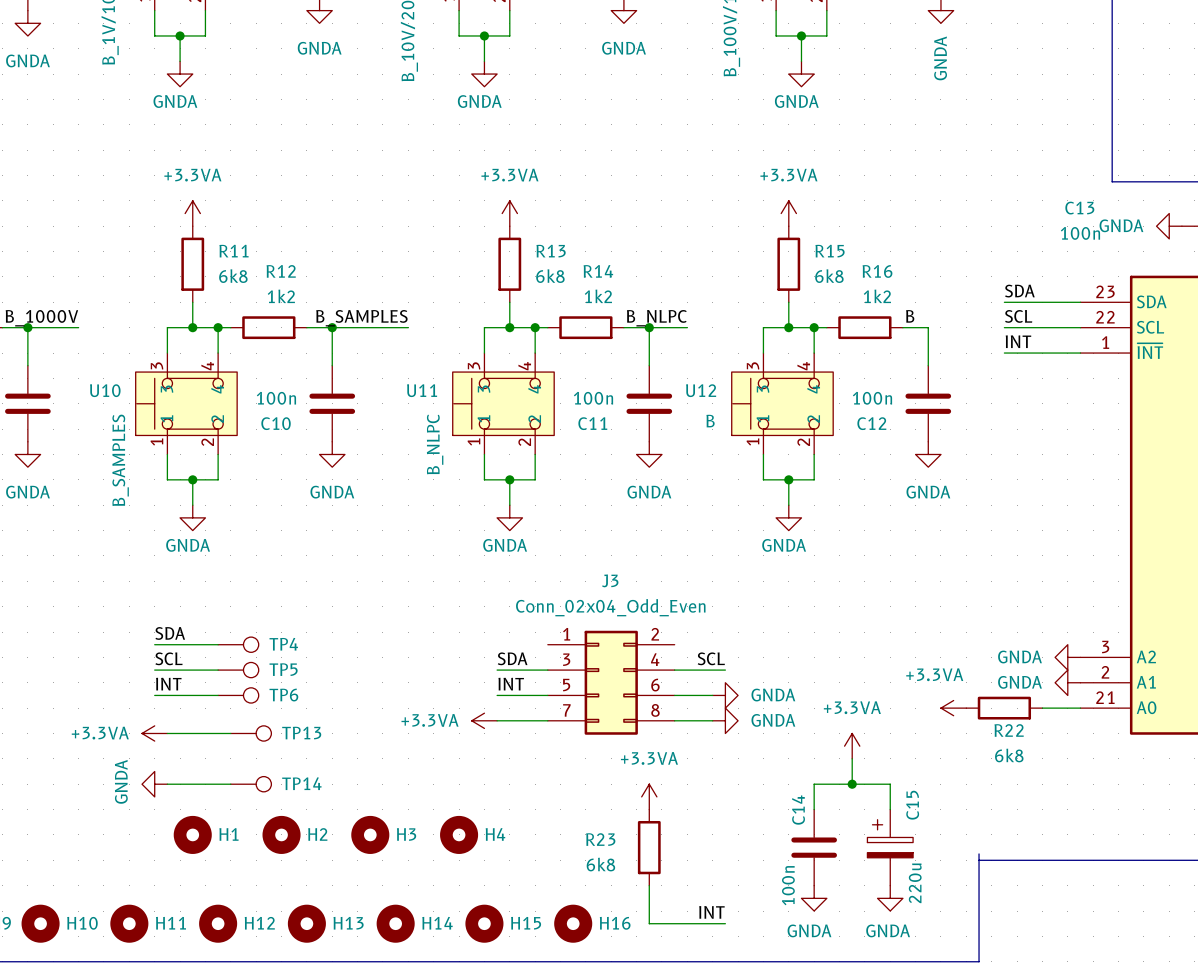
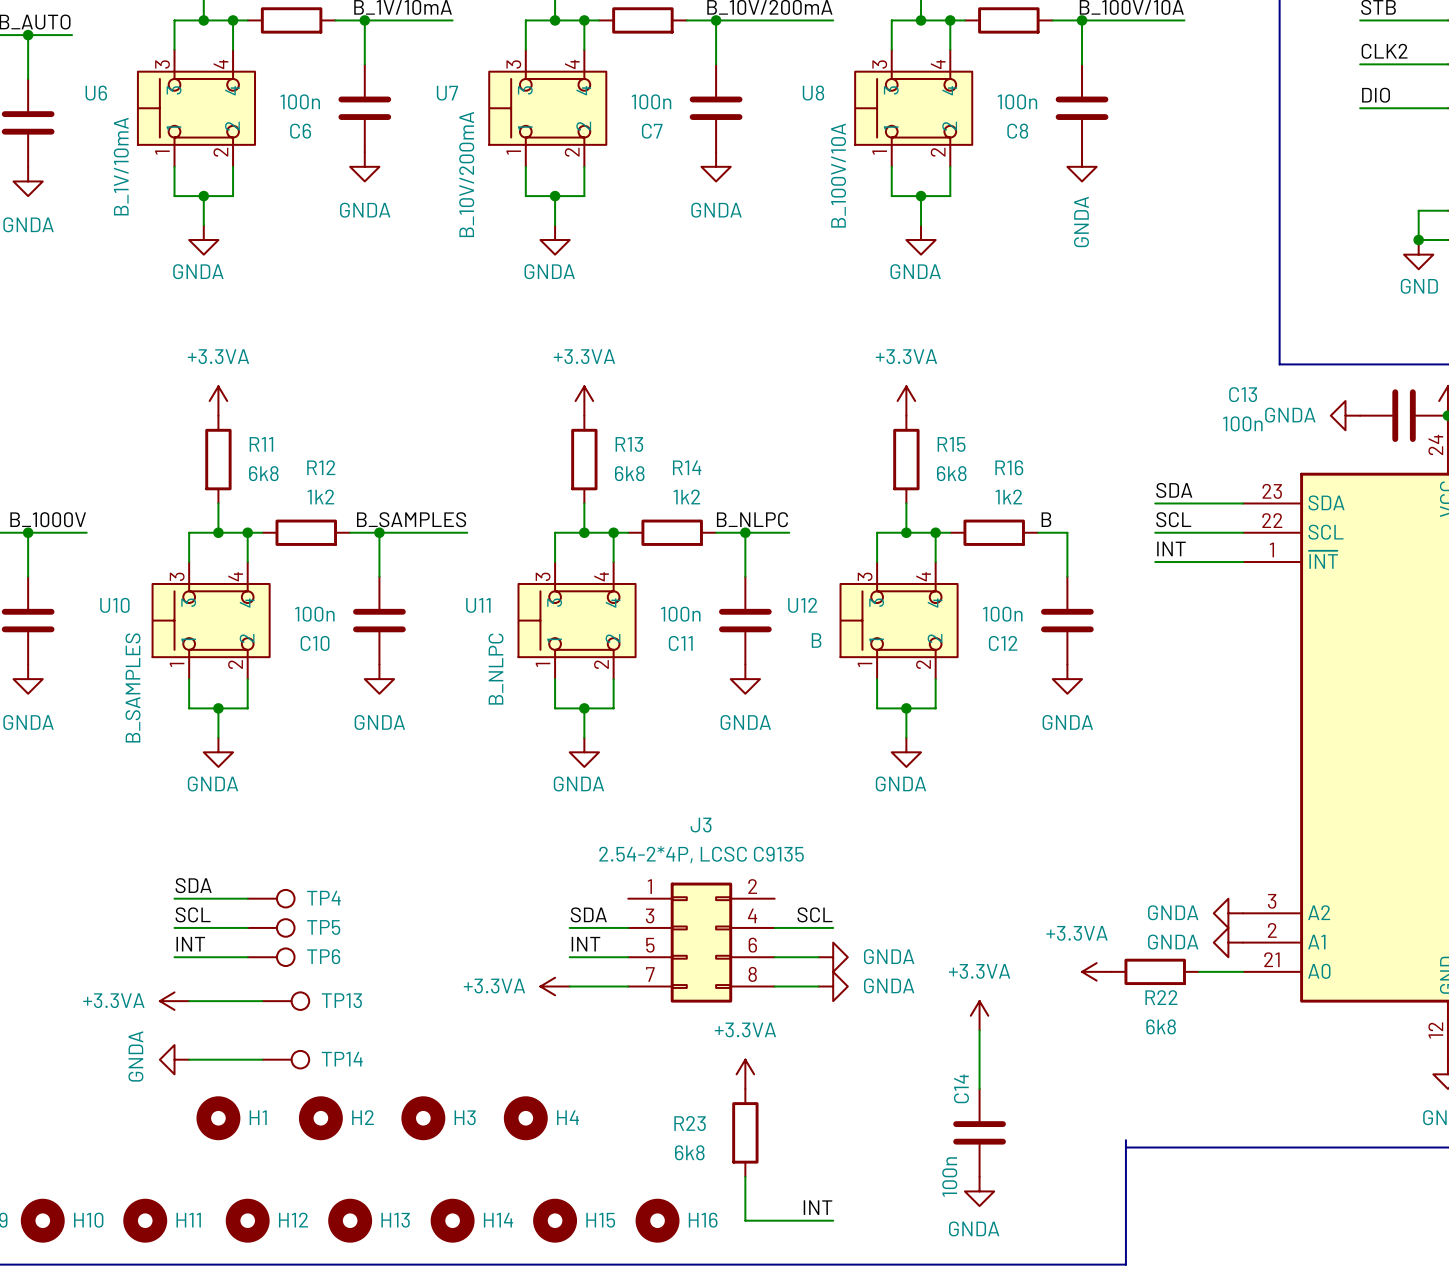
J3 value: Conn_02x04_Odd_Even (610, 607) -> 2.54-2*4P, LCSC C9135 (701, 854)
wire: none -> (979, 1059) (979, 1088)
junction: (852, 784) -> none
wire: (814, 809) (814, 784) (890, 784) (890, 809) -> none
C14 position: (814, 847) -> (979, 1132)
C15: 220u (890, 847) -> none
power symbol: GNDA (814, 898) -> none
power symbol: none -> GNDA (979, 1191)
power symbol: GNDA (890, 898) -> none

